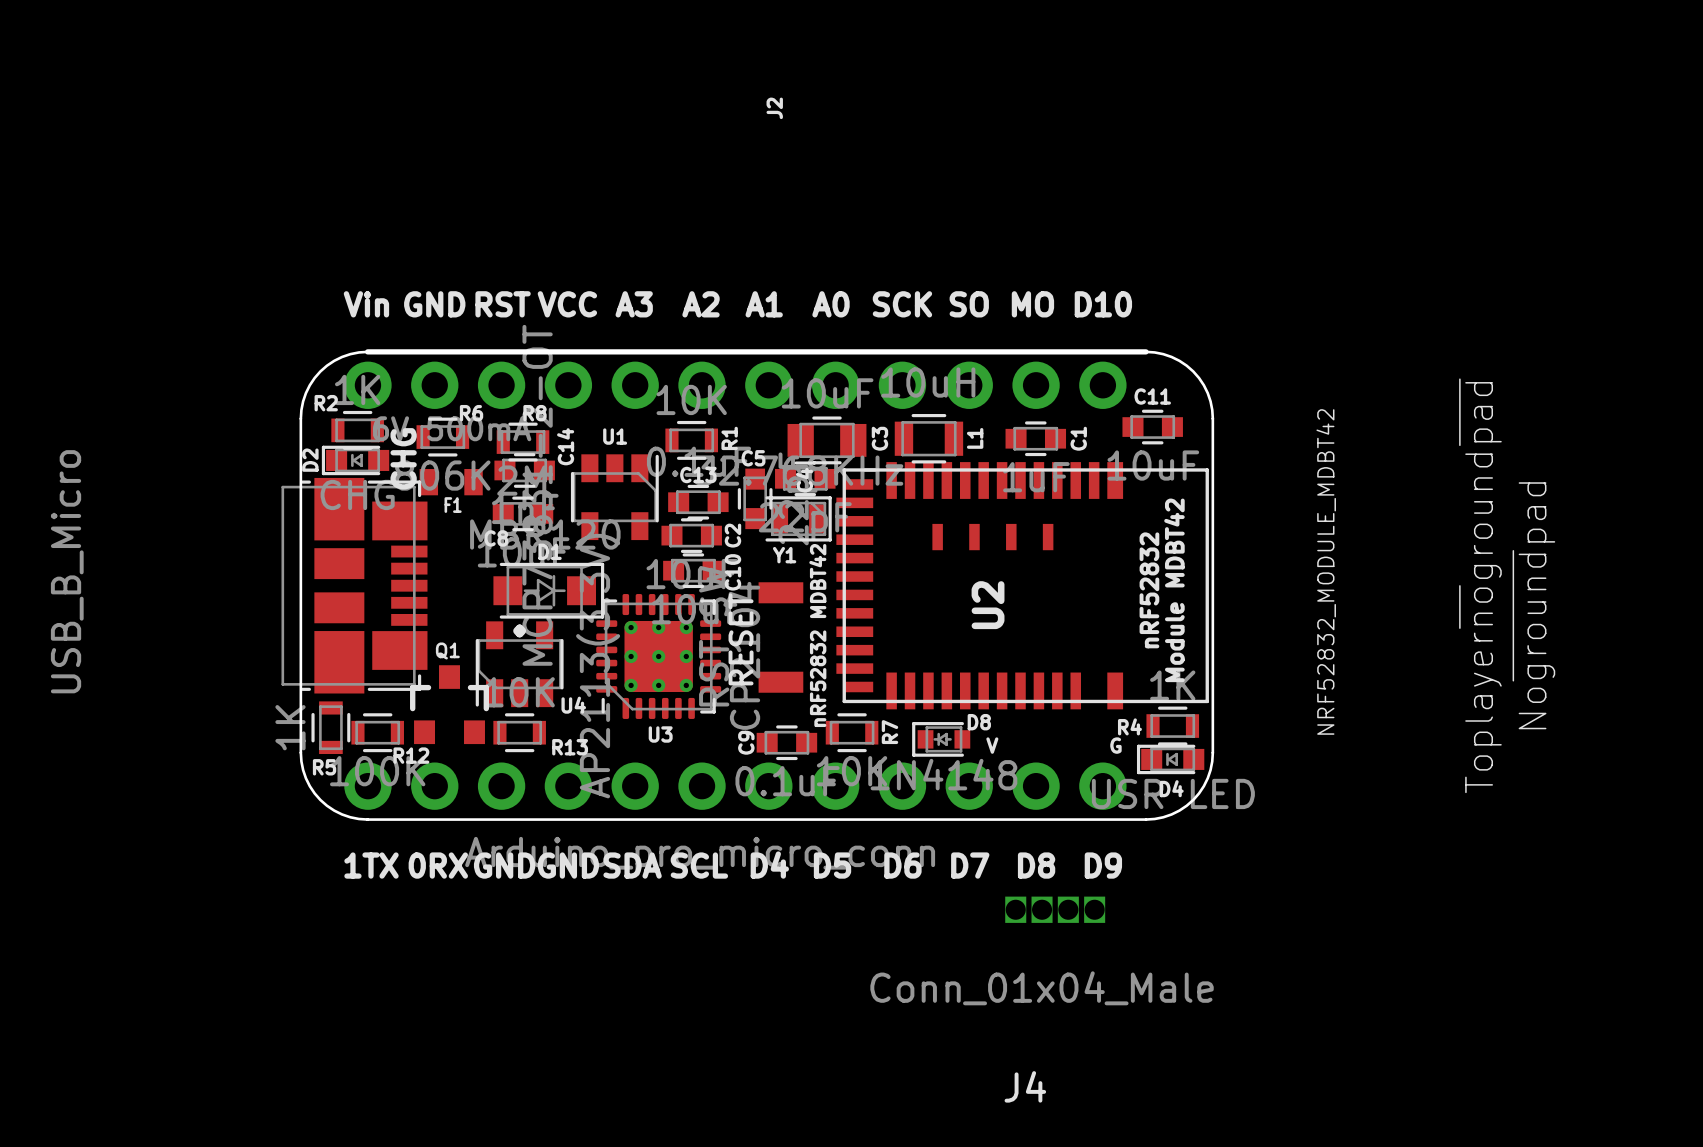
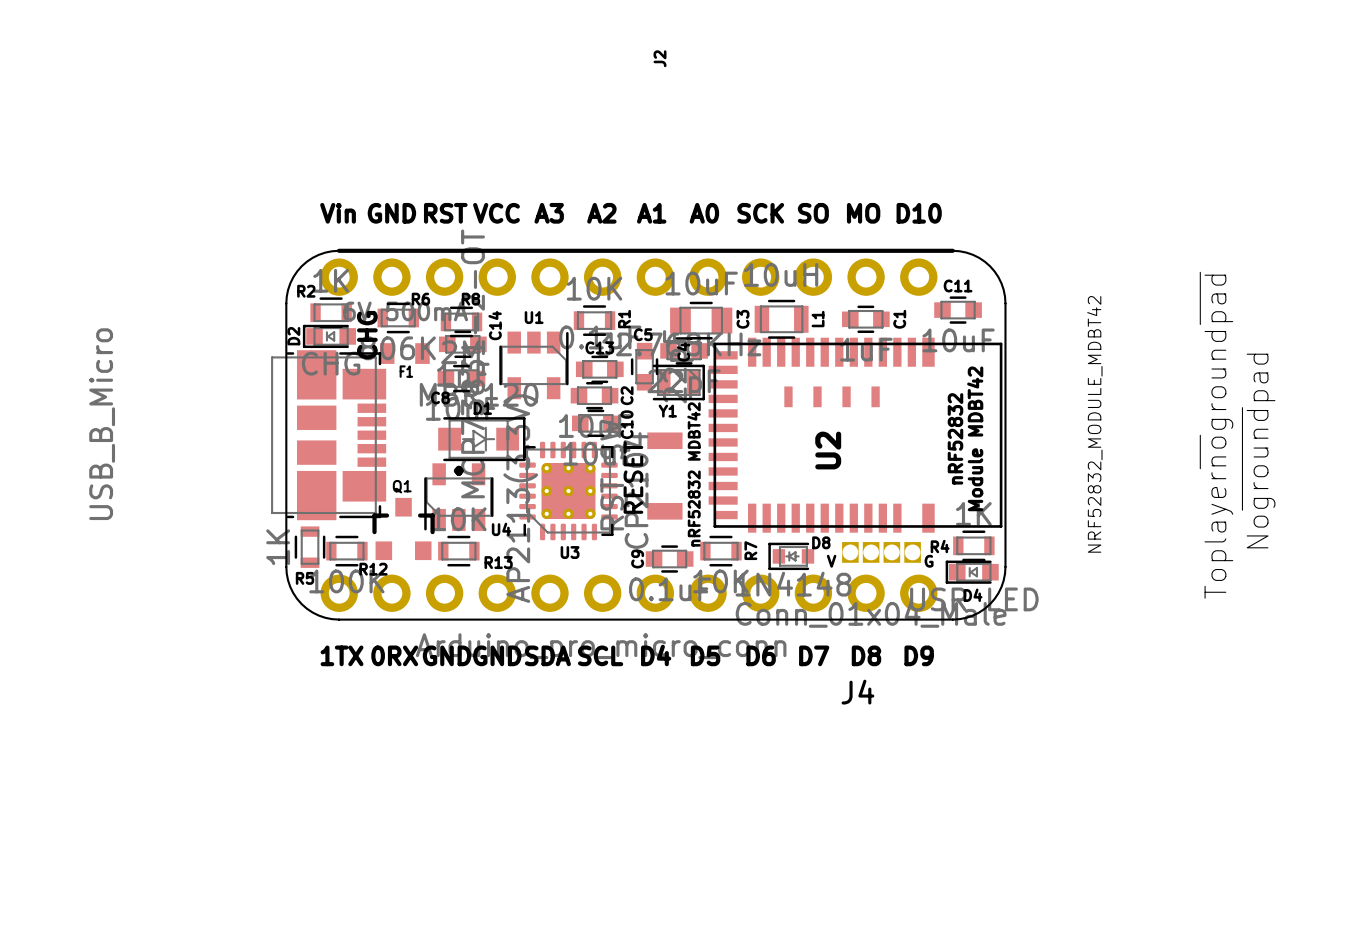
J4 position: (1055, 909) -> (881, 552)

